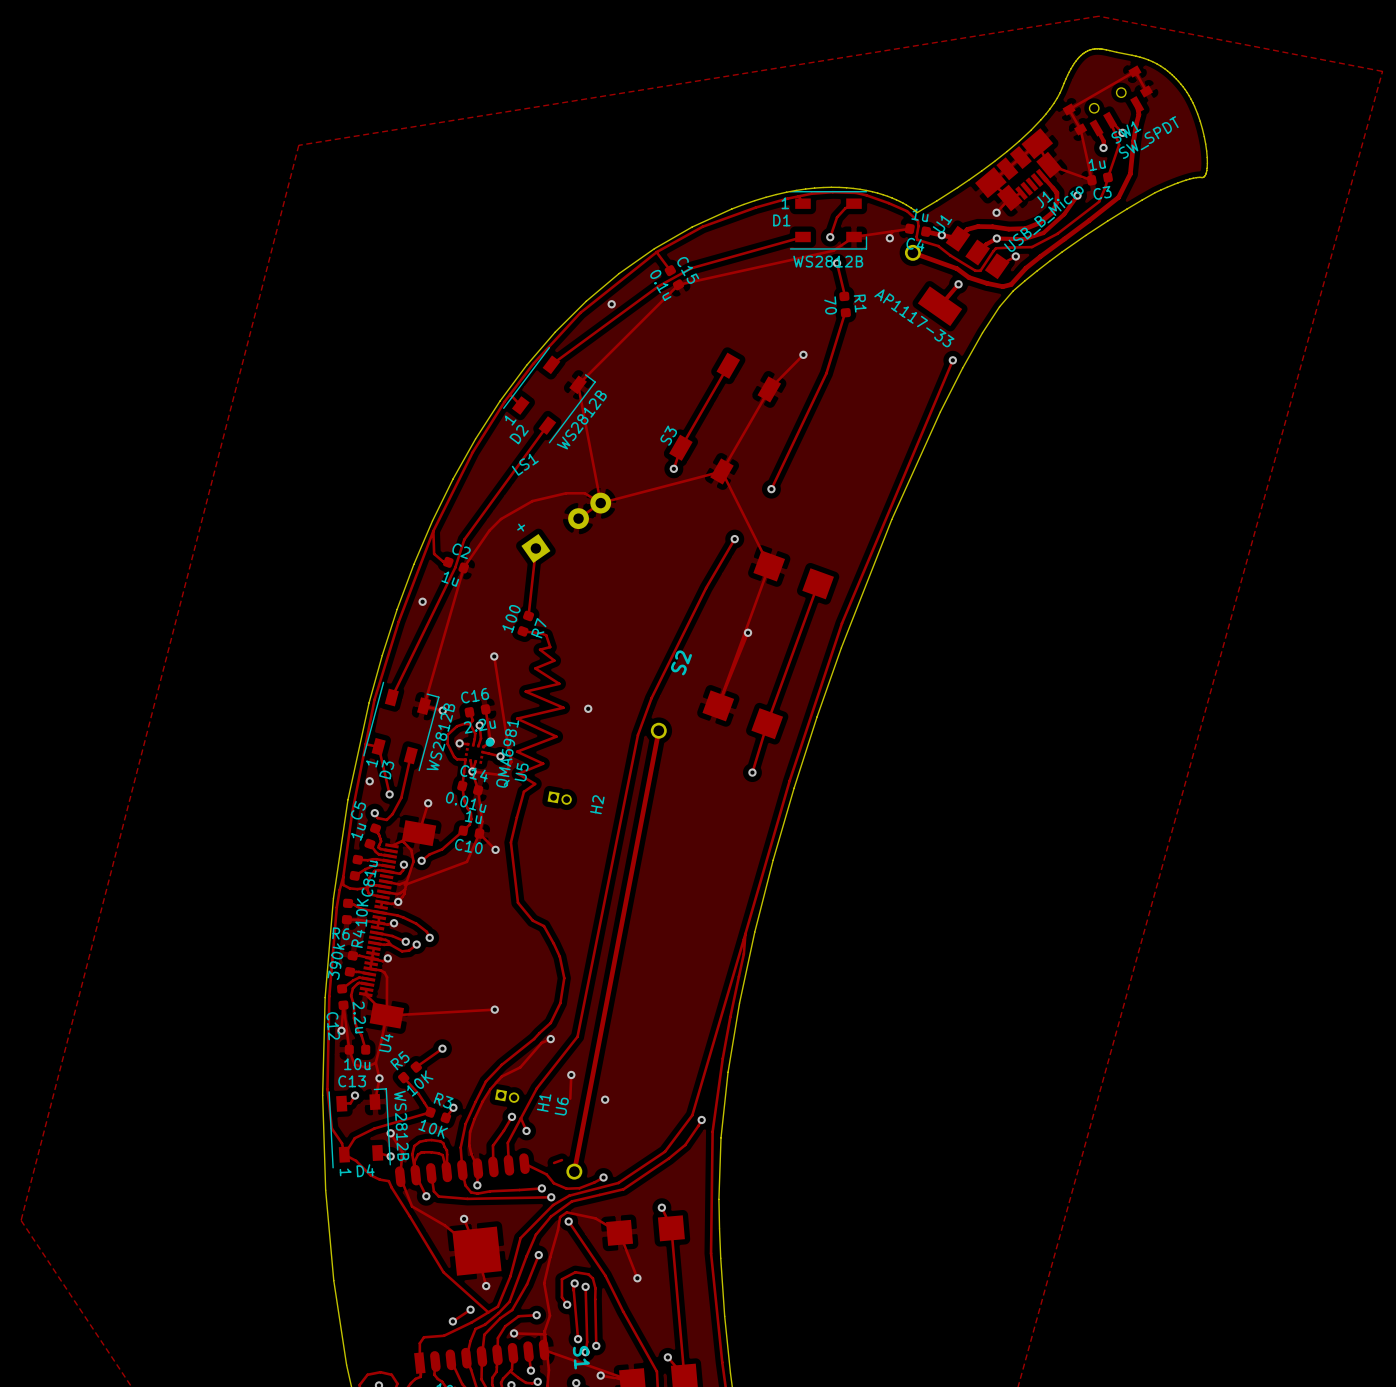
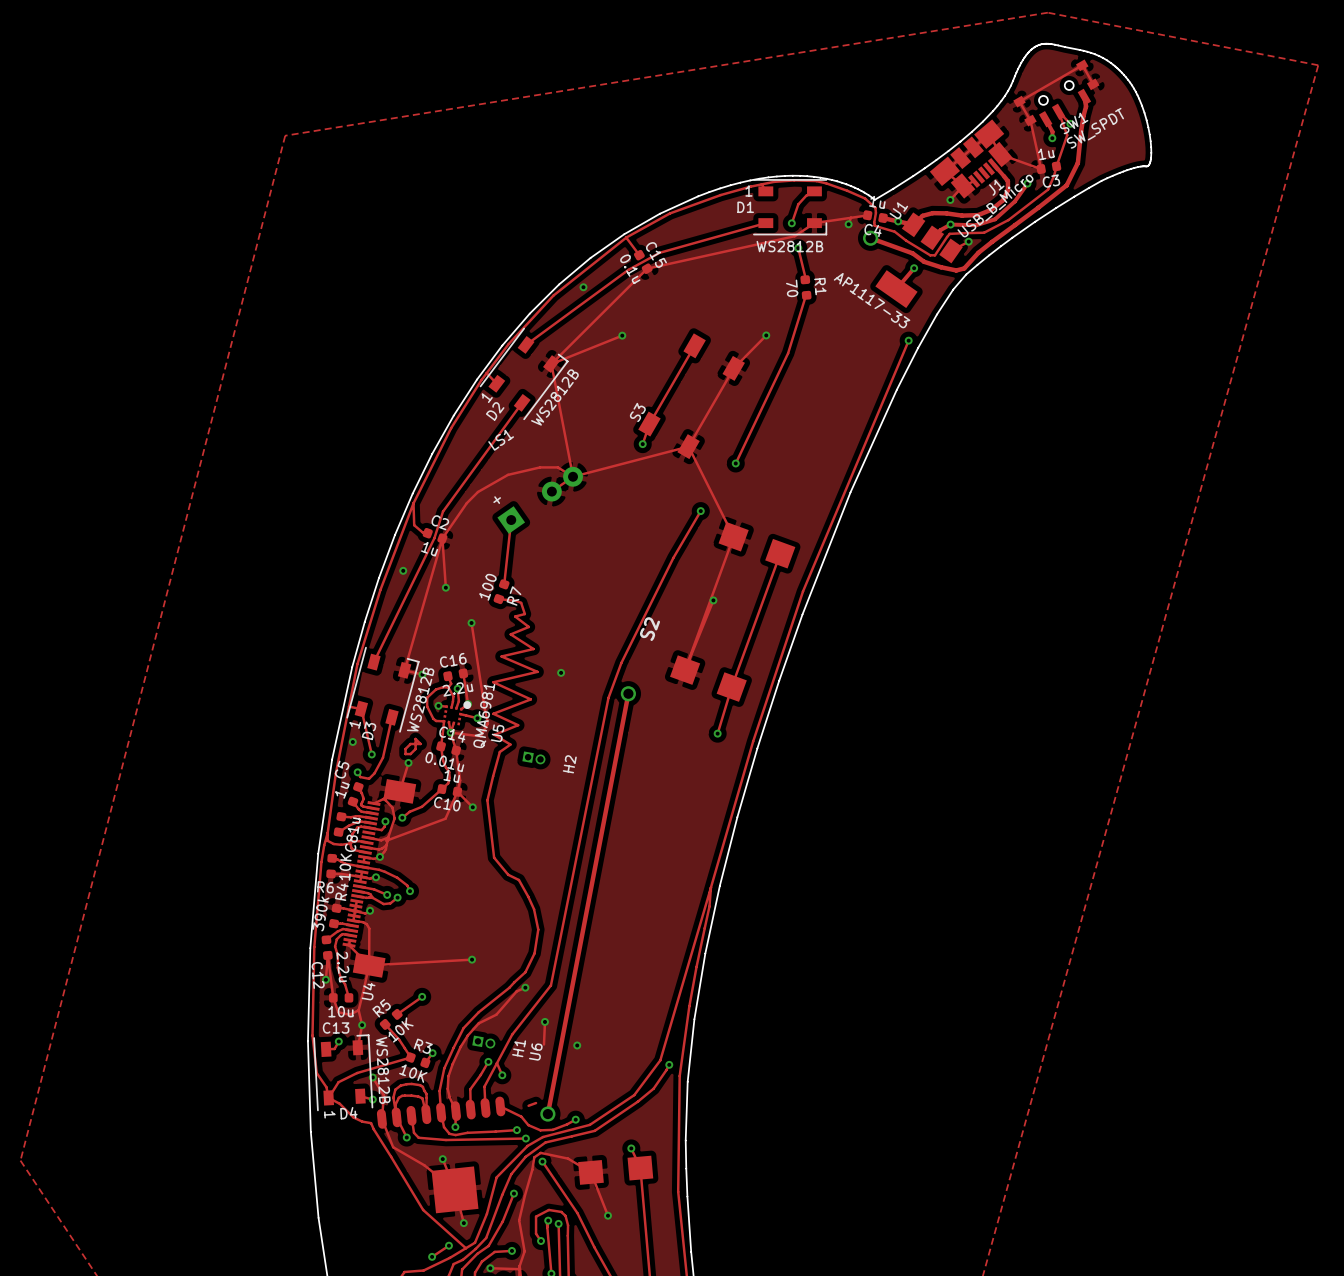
track: none -> (622, 335) (551, 364)
via: none -> (622, 335)
track: none -> (442, 538) (445, 587)
via: none -> (445, 587)
track: none -> (415, 738) (420, 743) (410, 743) (405, 749) (405, 754) (410, 754) (415, 749) (415, 738)

